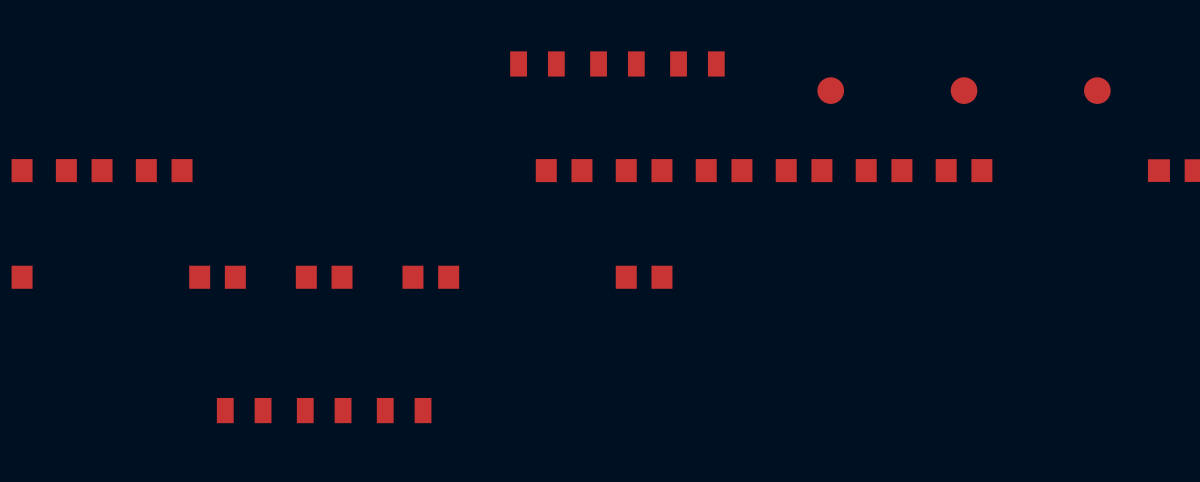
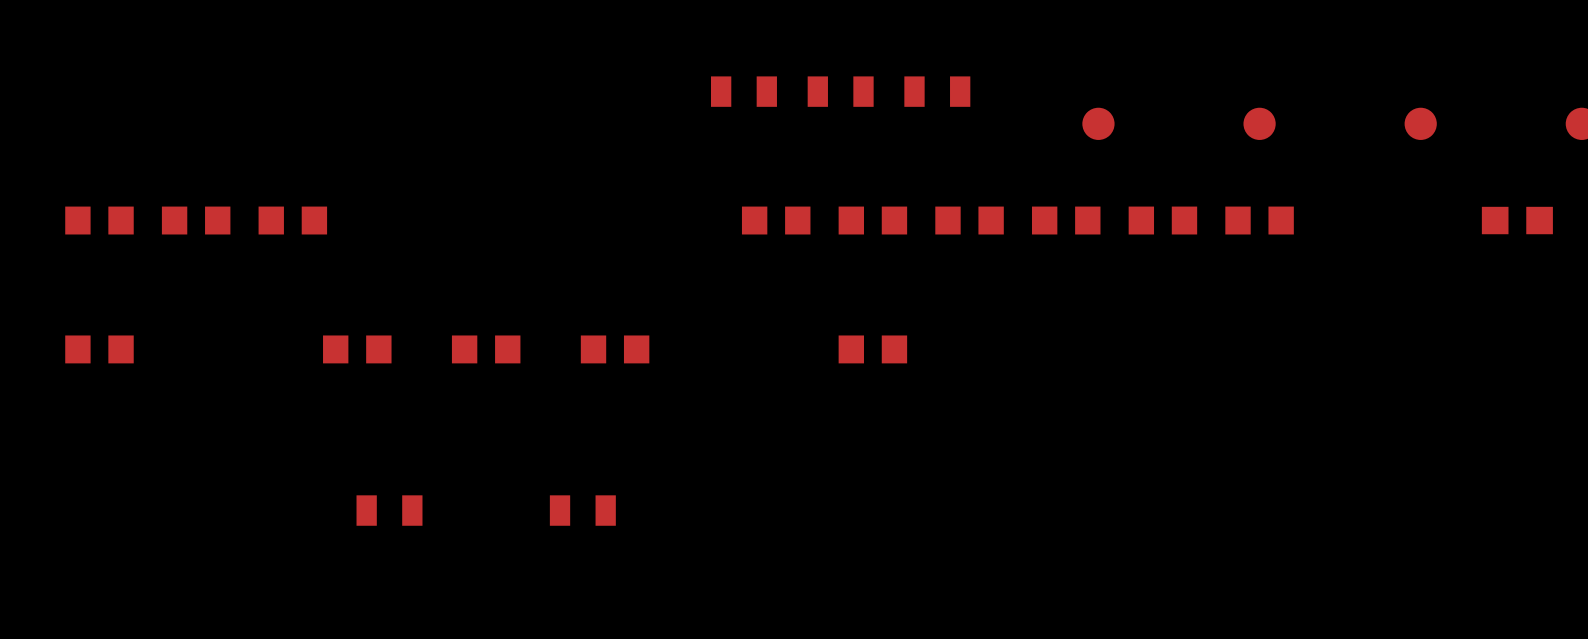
part: (324, 410) -> none

